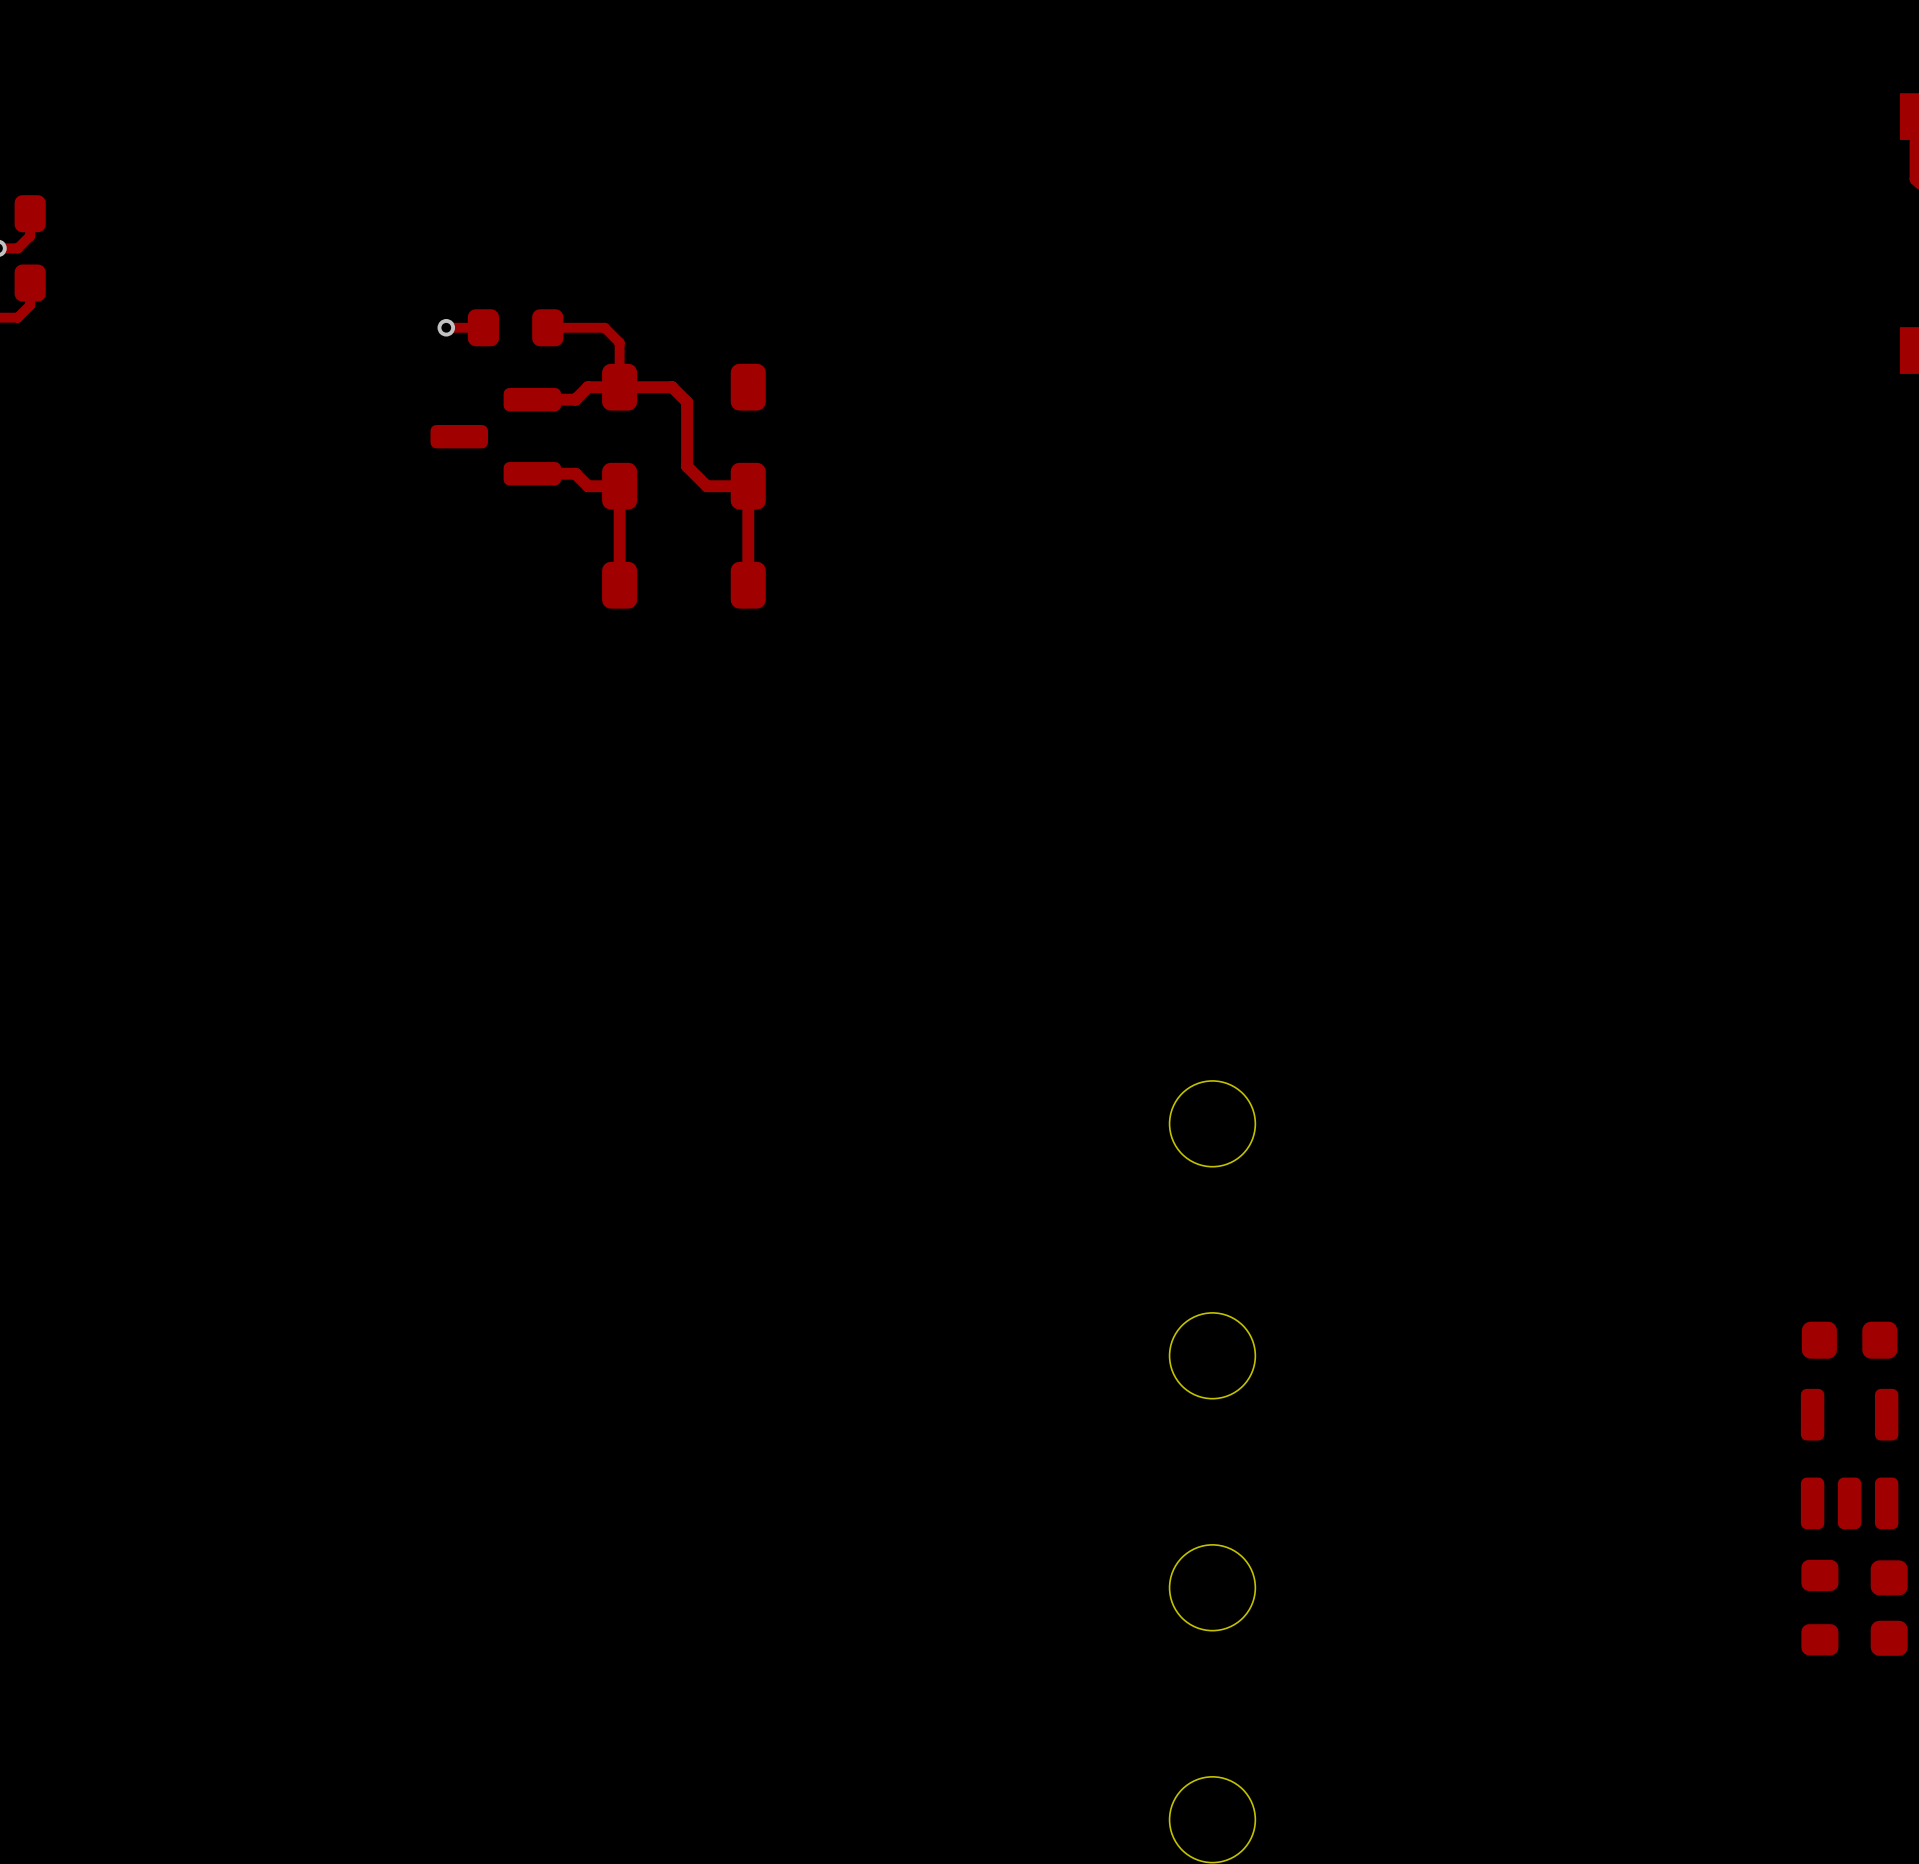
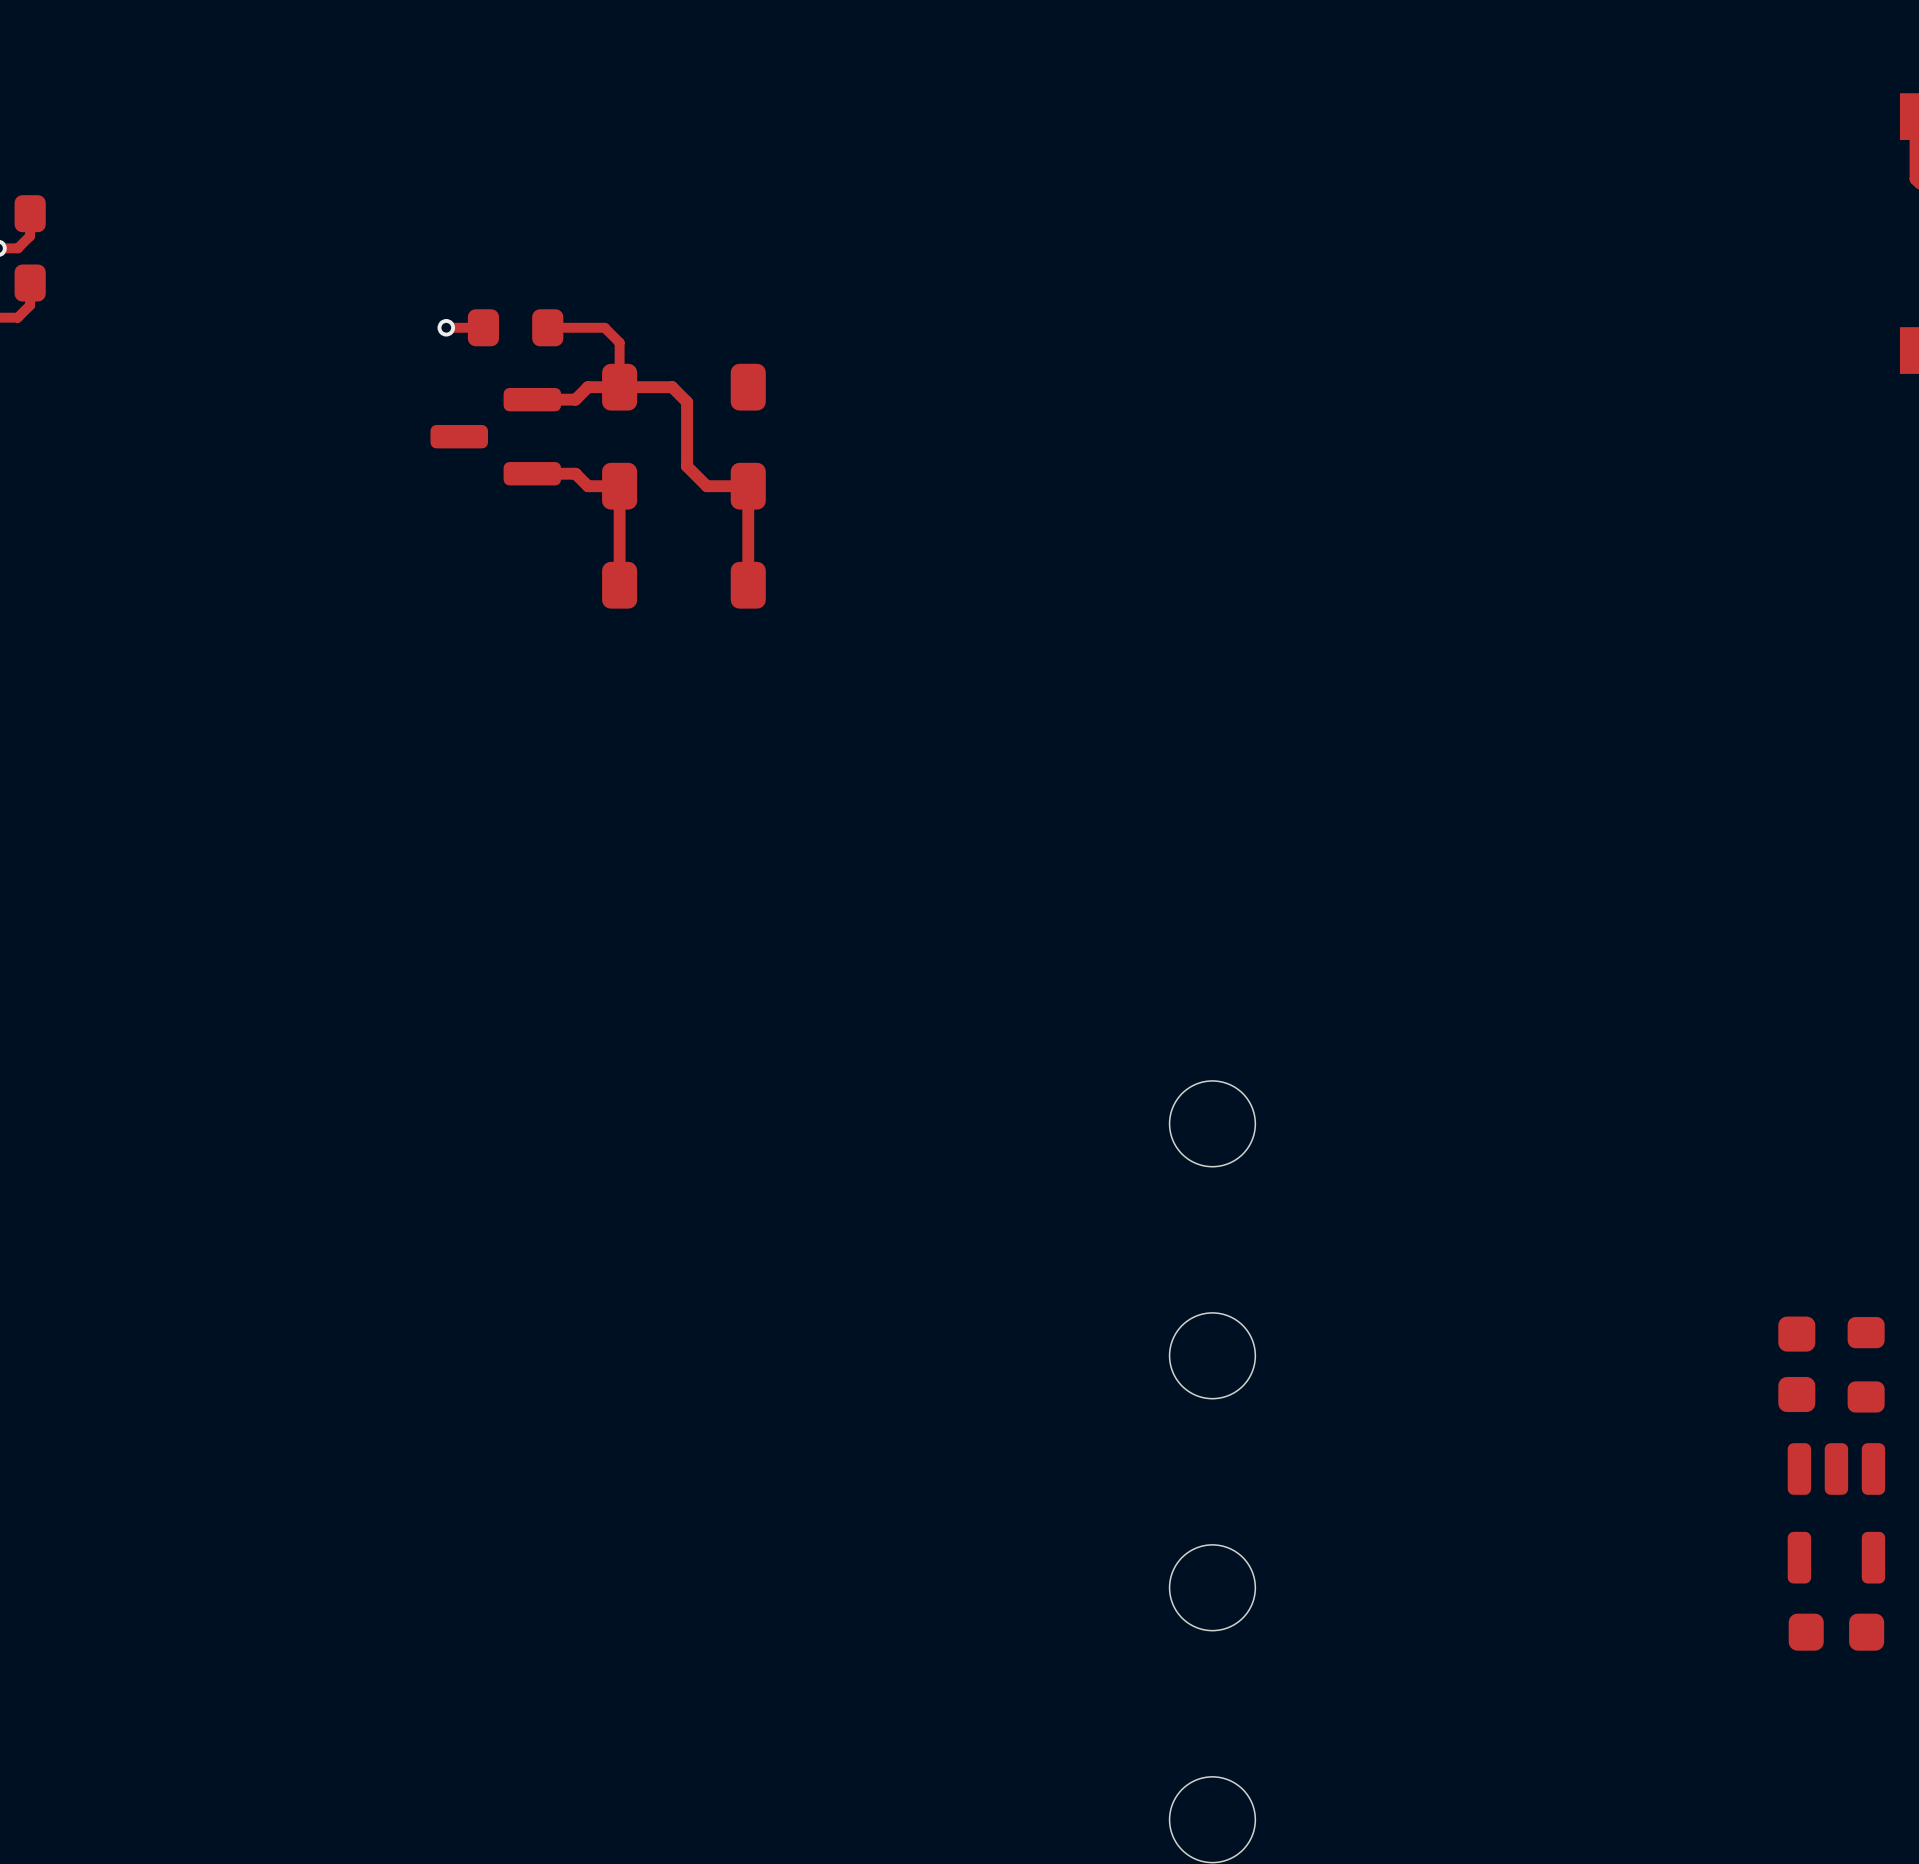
part rotation: 0° (1849, 1340) -> 90° clockwise (1796, 1364)
part position: (1849, 1340) -> (1796, 1364)
part rotation: 0° (1849, 1459) -> 180° (1836, 1513)
part position: (1819, 1607) -> (1866, 1364)
part rotation: 0° (1889, 1608) -> 90° clockwise (1836, 1632)
part position: (1889, 1608) -> (1836, 1632)

